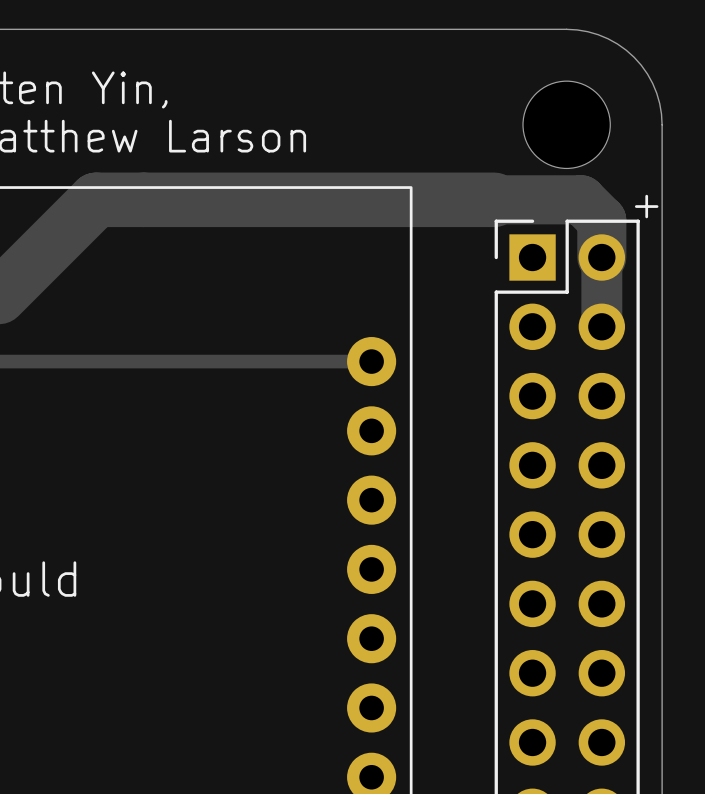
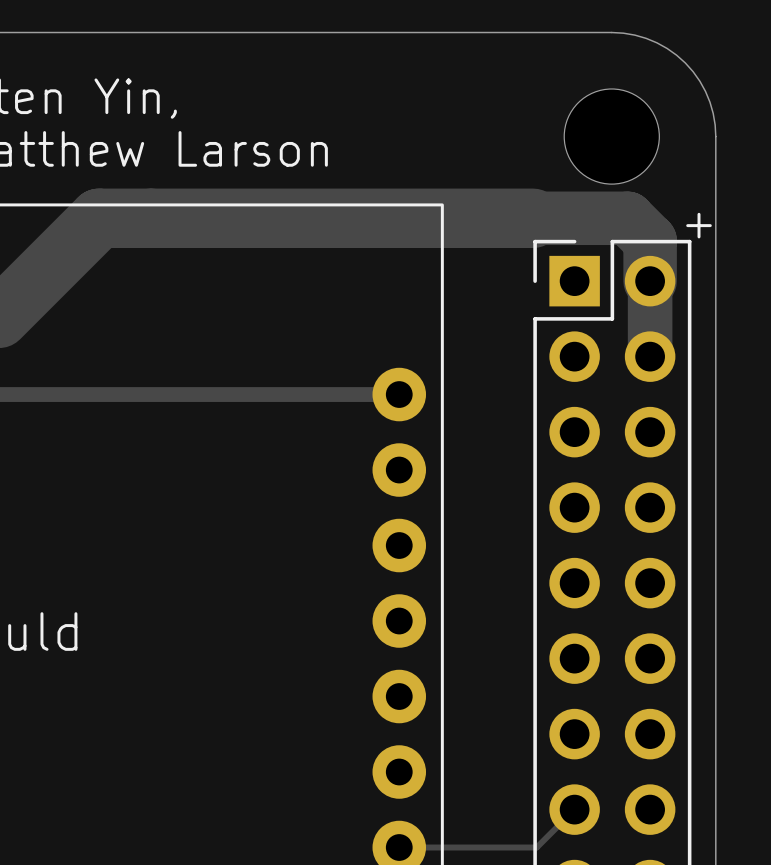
track: none -> (574, 809) (536, 847) (399, 847)

